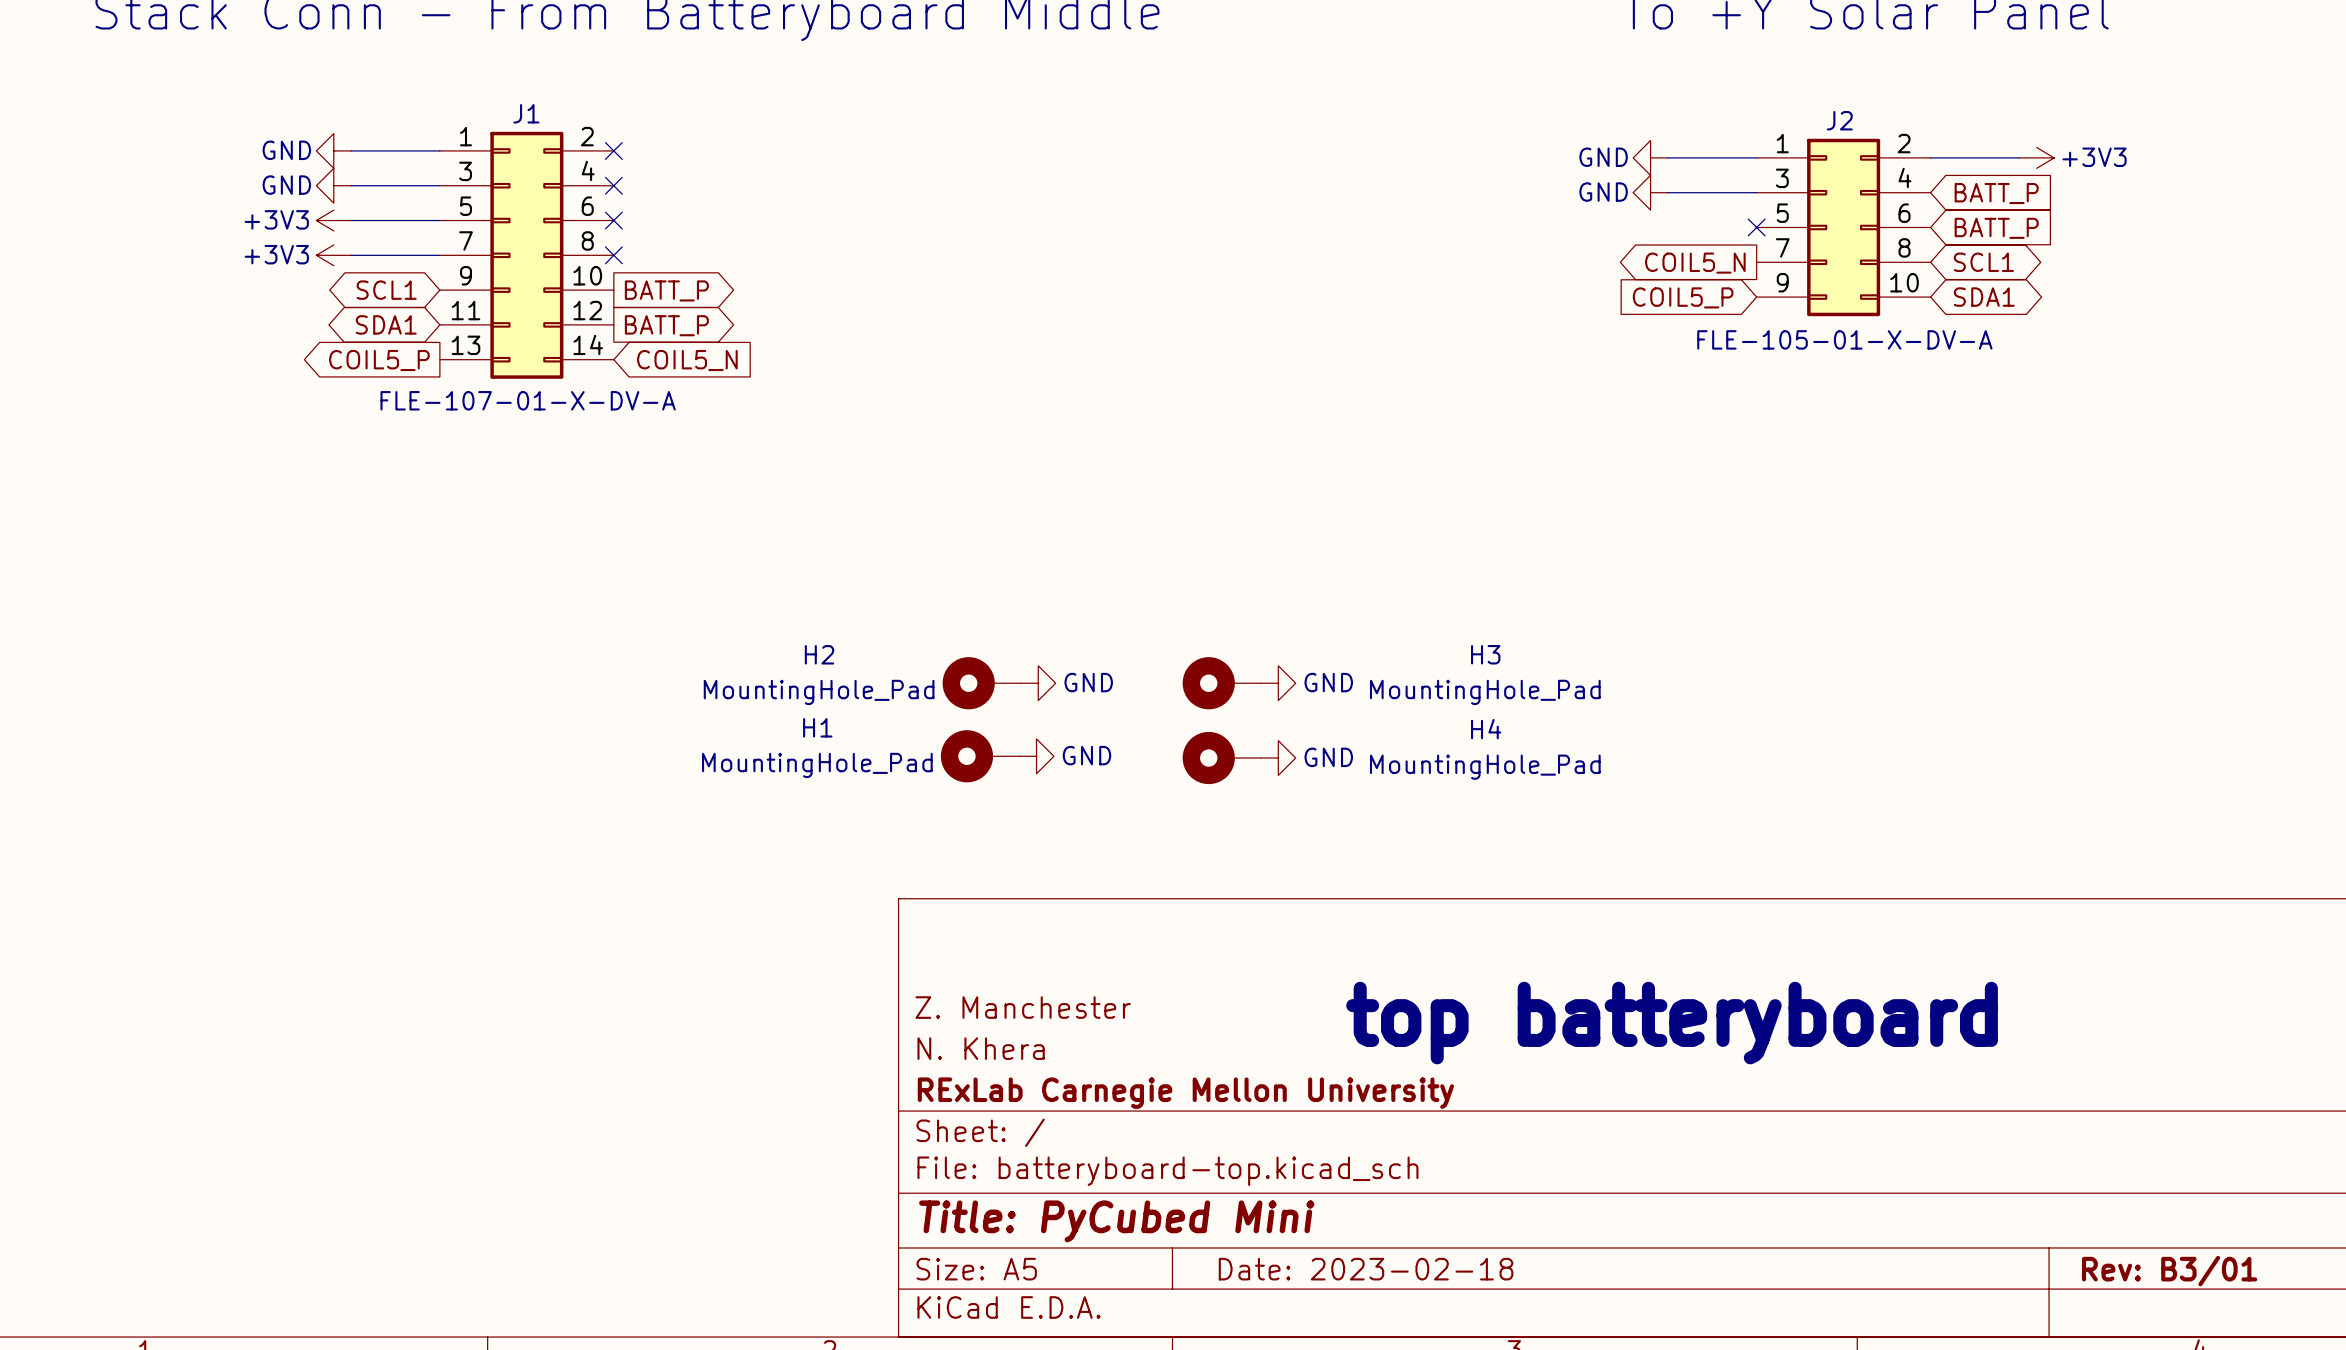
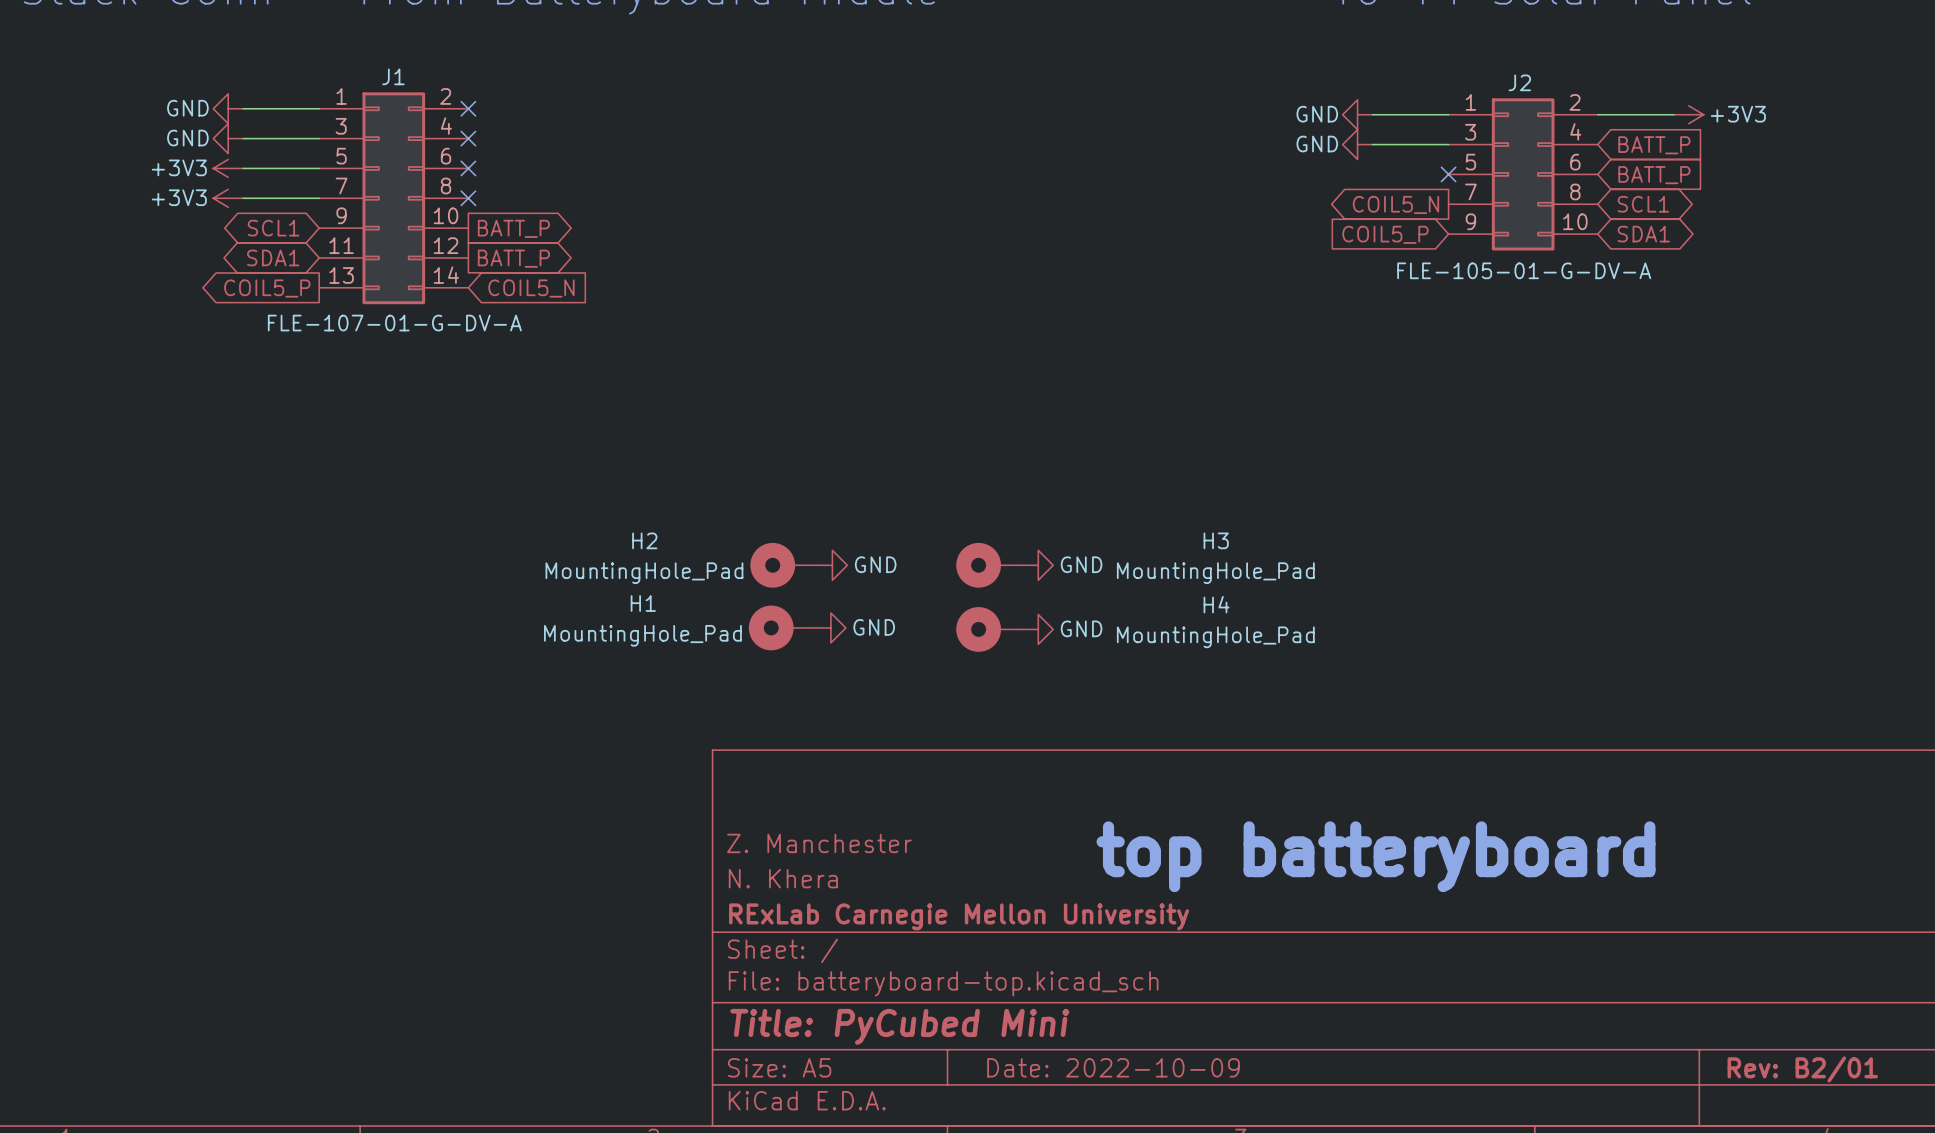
J2 value: FLE-105-01-X-DV-A (1844, 339) -> FLE-105-01-G-DV-A (1524, 270)
J1 value: FLE-107-01-X-DV-A (528, 400) -> FLE-107-01-G-DV-A (394, 323)
title block: Date: 2023-02-18 (1366, 1269) -> Date: 2022-10-09 (1113, 1067)
title block: Rev: B3/01 (2169, 1271) -> Rev: B2/01 (1802, 1069)

